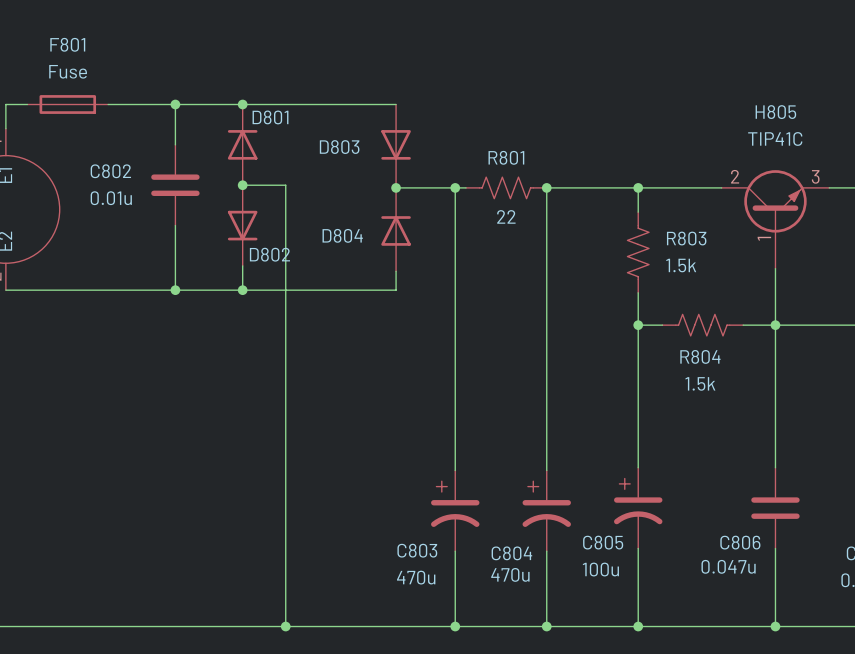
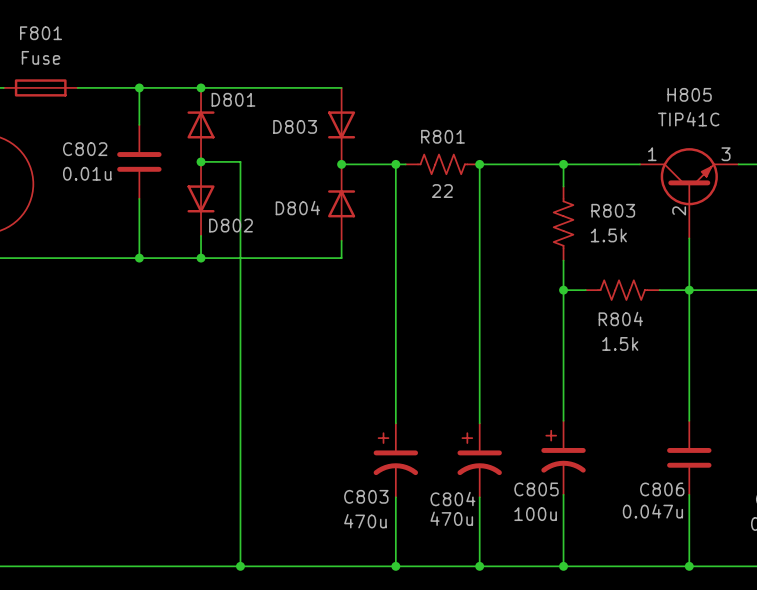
H805 pin number: 2 (735, 176) -> 1 (652, 154)
H805 pin number: 1 (764, 238) -> 2 (679, 210)

